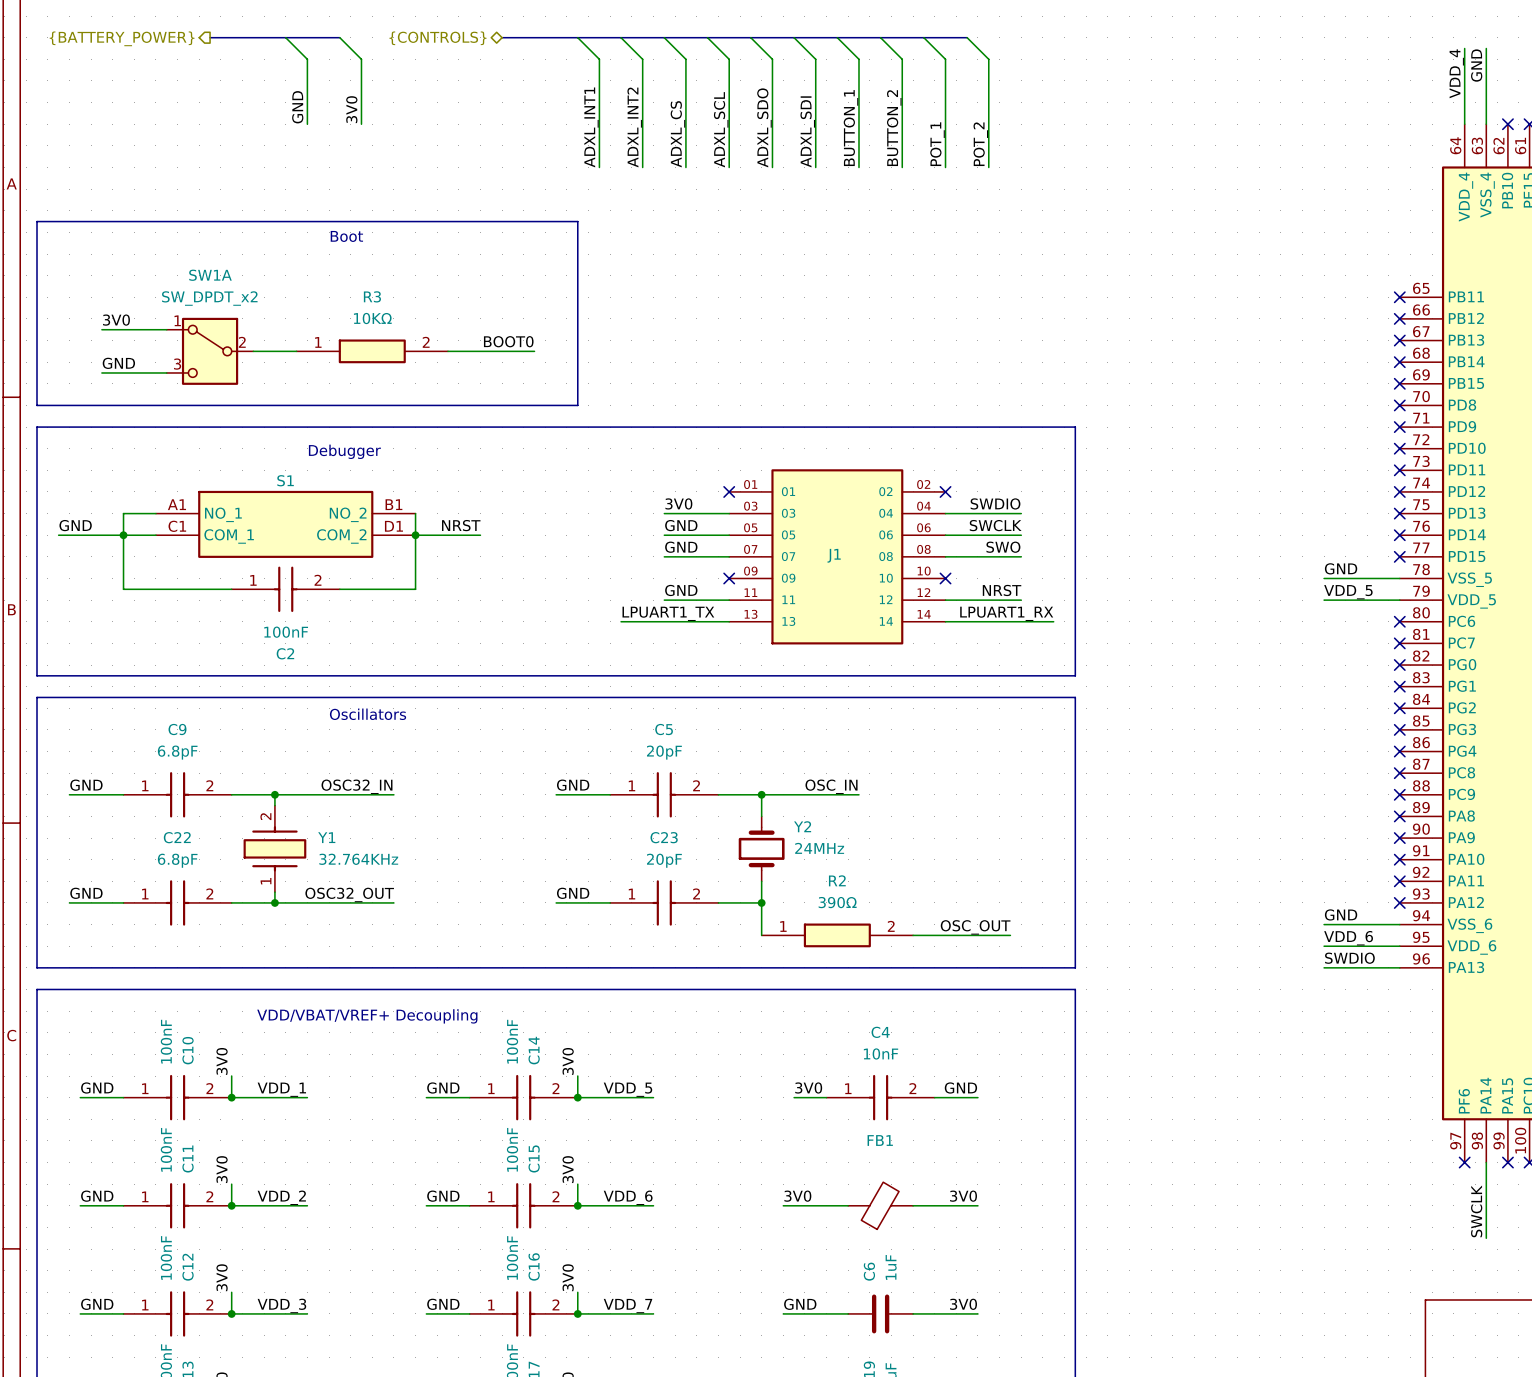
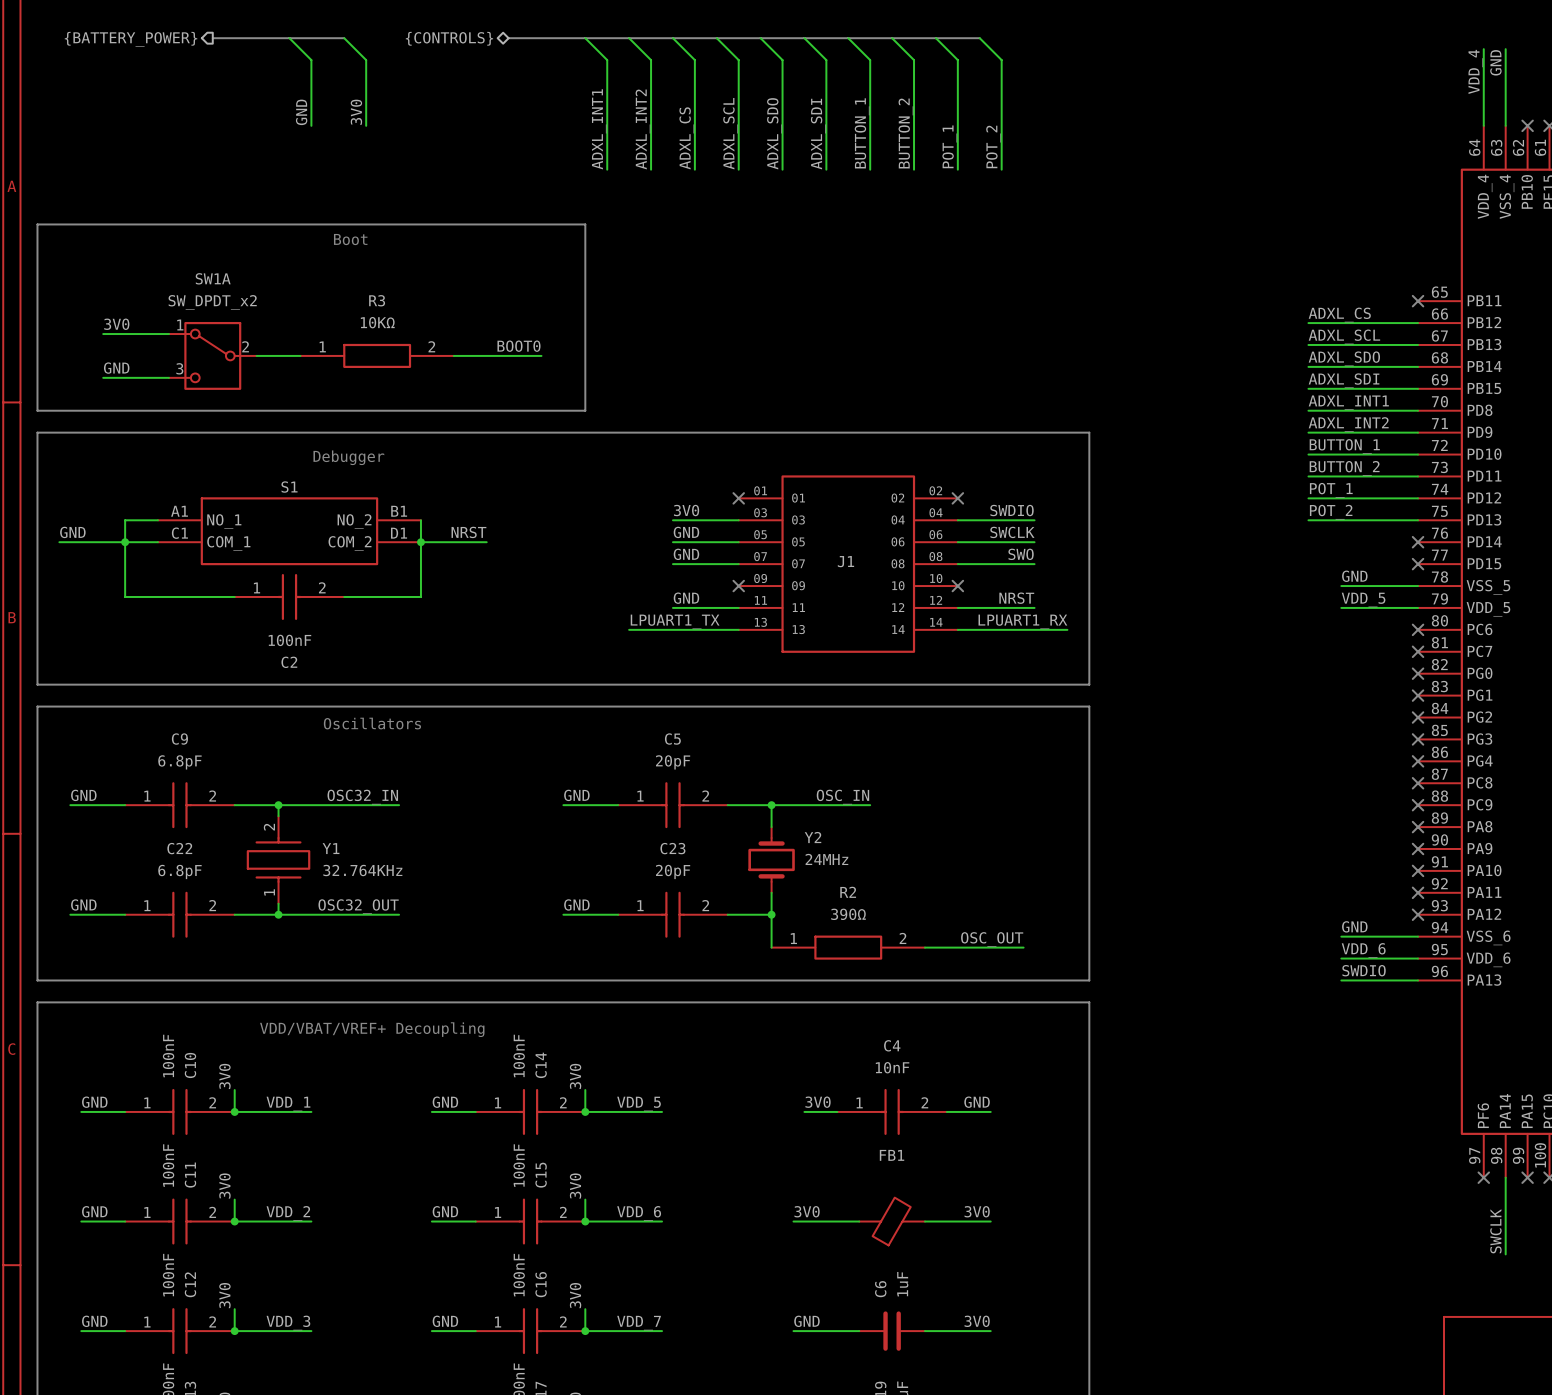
label: none -> ADXL_CS (1339, 314)
wire: none -> (1308, 323) (1418, 323)
no-connect mark: (1399, 318) -> none
label: none -> ADXL_SCL (1344, 336)
wire: none -> (1308, 344) (1418, 344)
no-connect mark: (1399, 340) -> none
label: none -> ADXL_SDO (1344, 358)
wire: none -> (1308, 366) (1418, 366)
no-connect mark: (1399, 362) -> none
label: none -> ADXL_SDI (1344, 380)
wire: none -> (1308, 388) (1418, 388)
no-connect mark: (1399, 383) -> none
label: none -> ADXL_INT1 (1348, 402)
wire: none -> (1308, 410) (1418, 410)
no-connect mark: (1399, 405) -> none
label: none -> ADXL_INT2 (1348, 424)
wire: none -> (1308, 432) (1418, 432)
no-connect mark: (1399, 427) -> none
label: none -> BUTTON_1 (1344, 446)
wire: none -> (1308, 454) (1418, 454)
no-connect mark: (1399, 448) -> none
label: none -> BUTTON_2 (1344, 468)
wire: none -> (1308, 476) (1418, 476)
no-connect mark: (1399, 470) -> none
label: none -> POT_1 (1331, 490)
wire: none -> (1308, 498) (1418, 498)
no-connect mark: (1399, 491) -> none
label: none -> POT_2 (1331, 512)
wire: none -> (1308, 520) (1418, 520)
no-connect mark: (1399, 513) -> none

